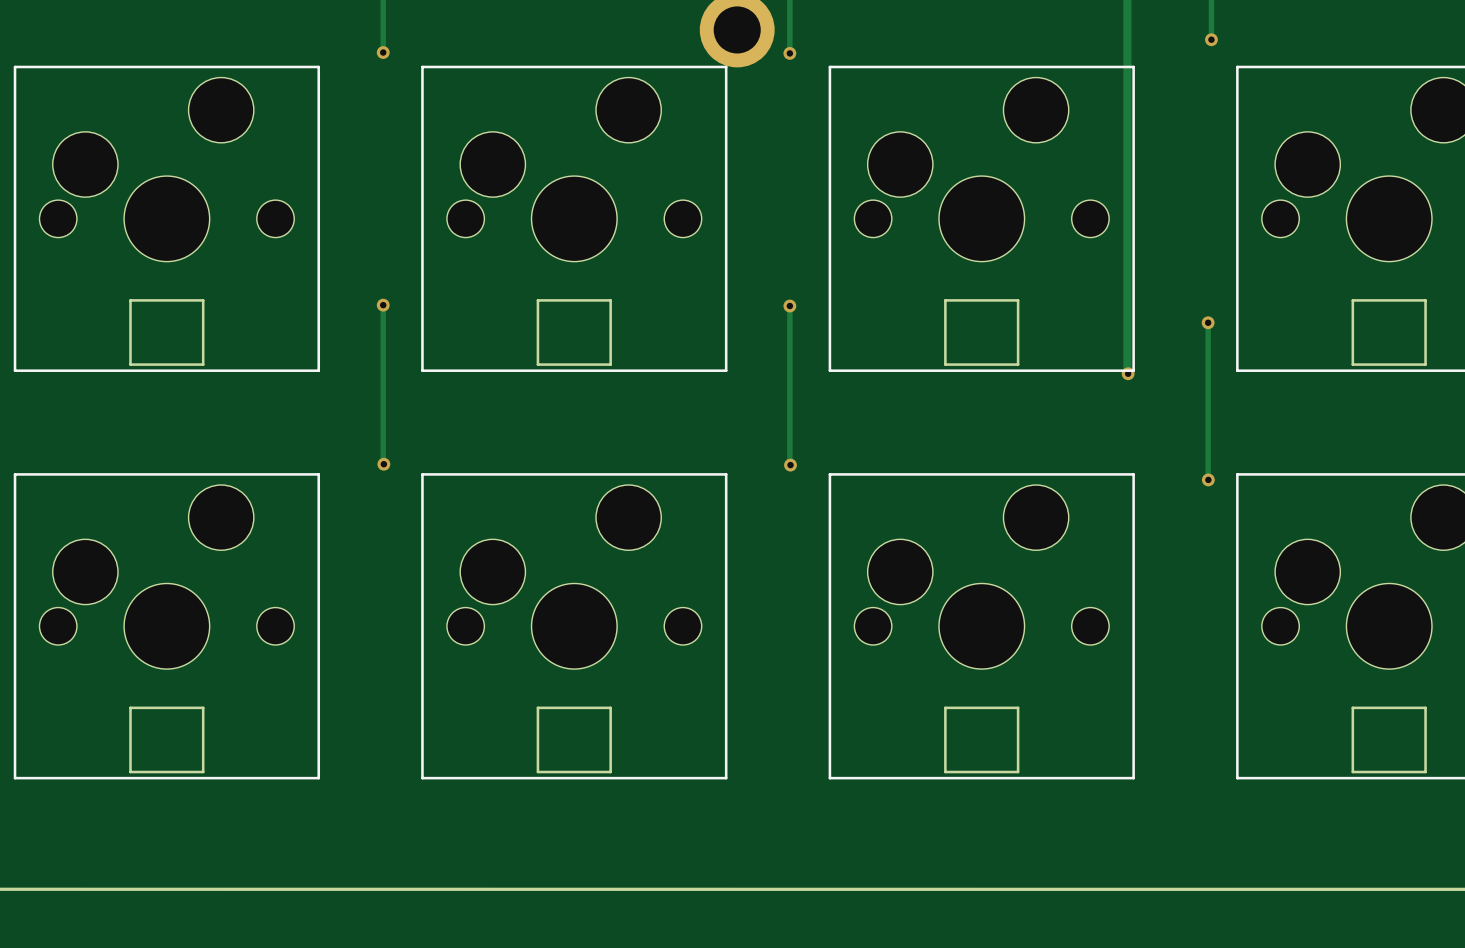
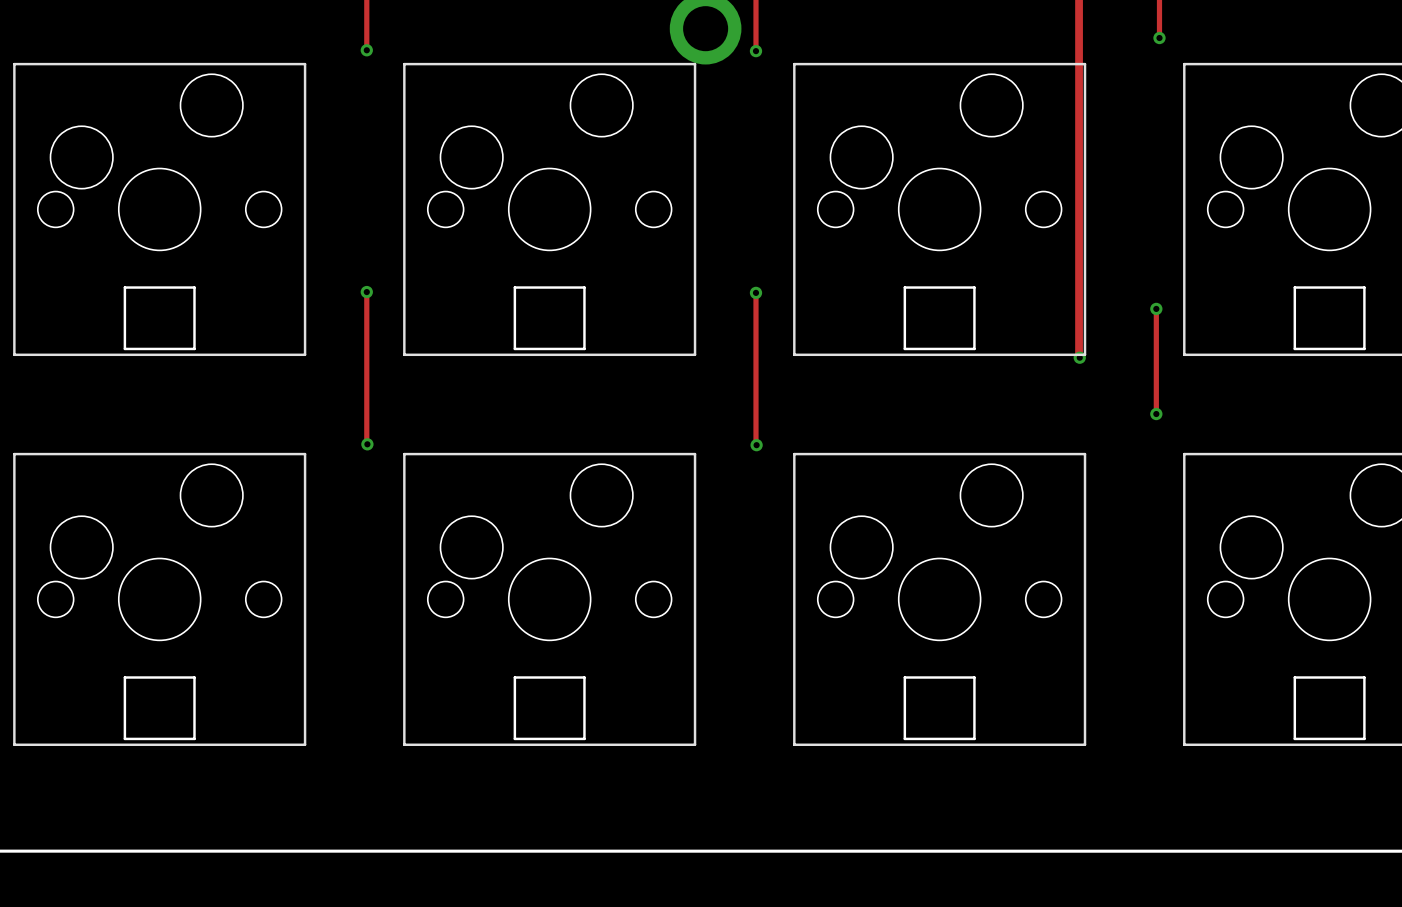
track: (1208, 432) (1208, 479) -> none
via position: (1208, 479) -> (1156, 414)

